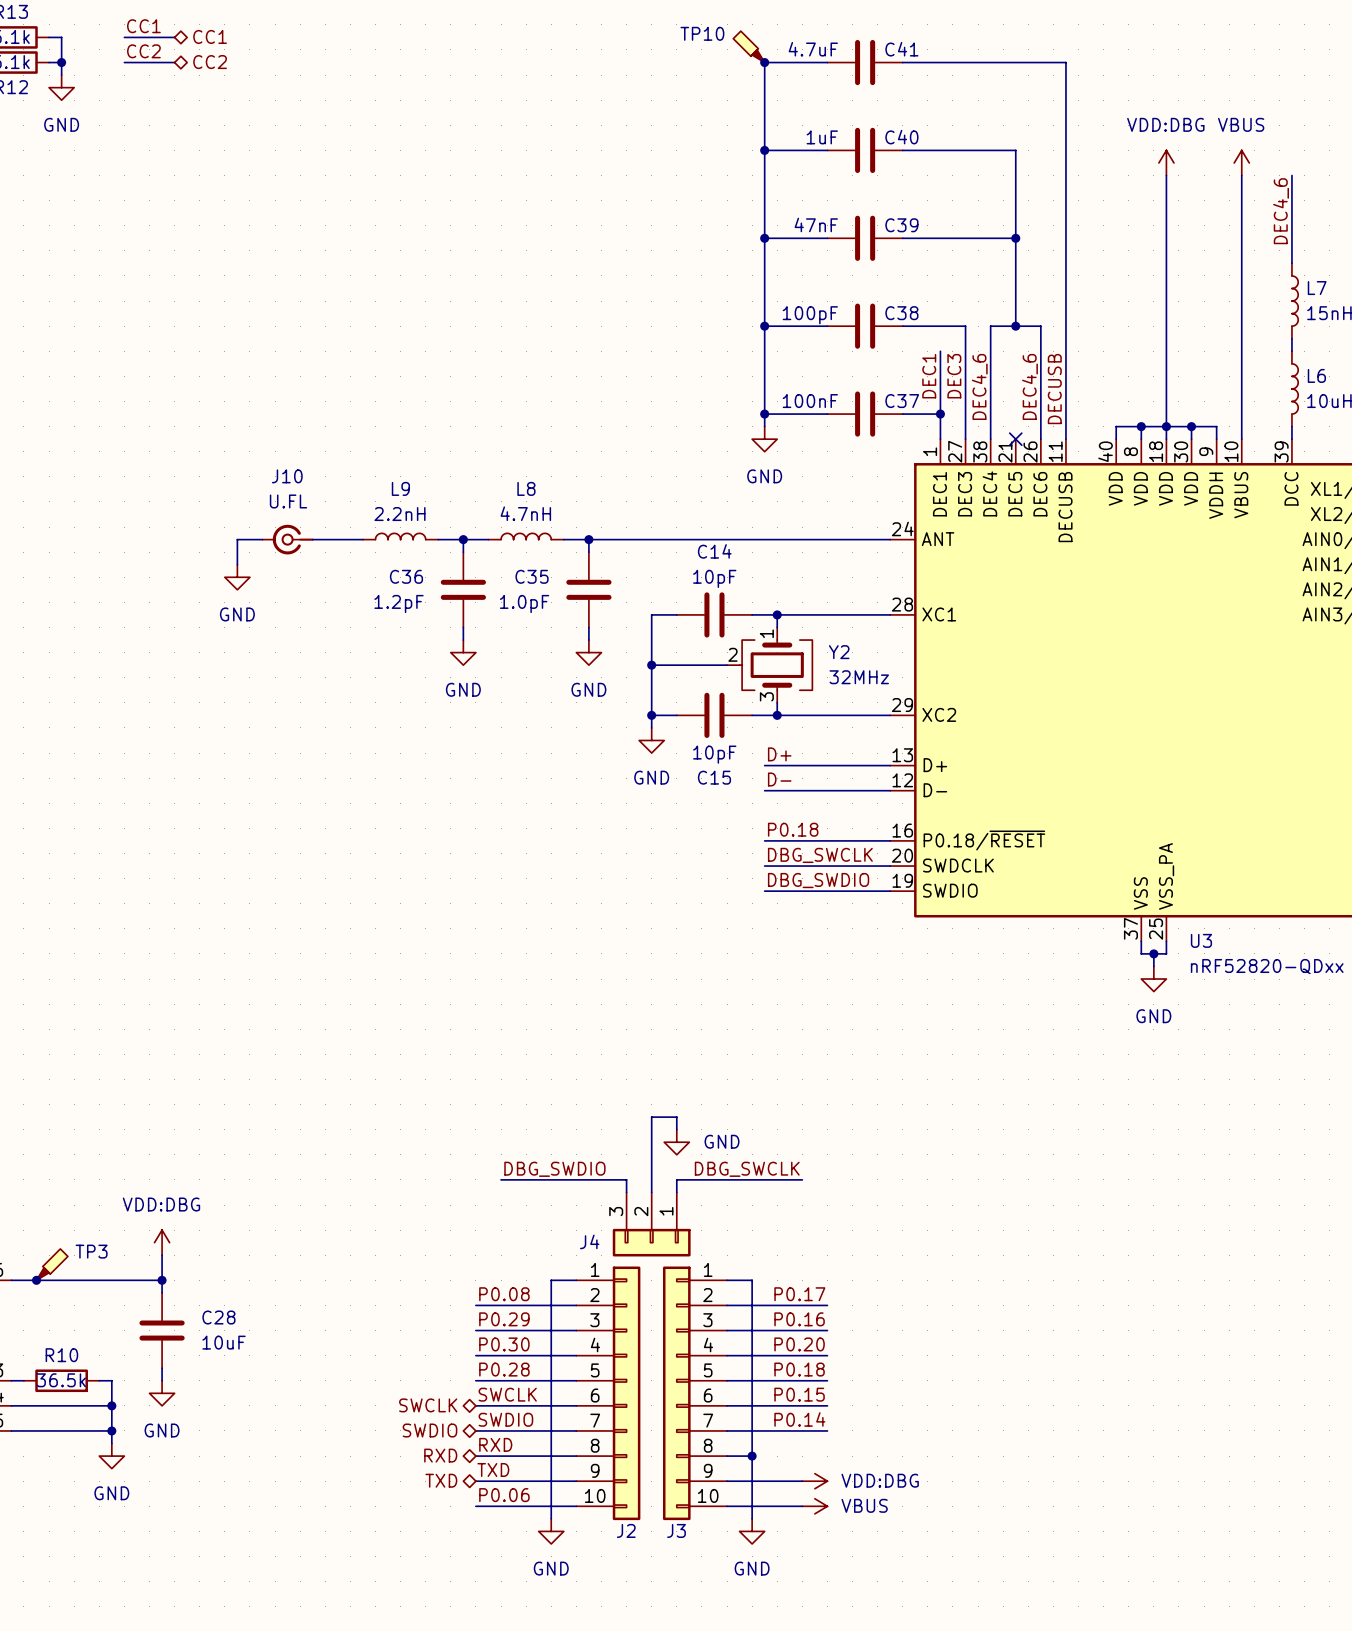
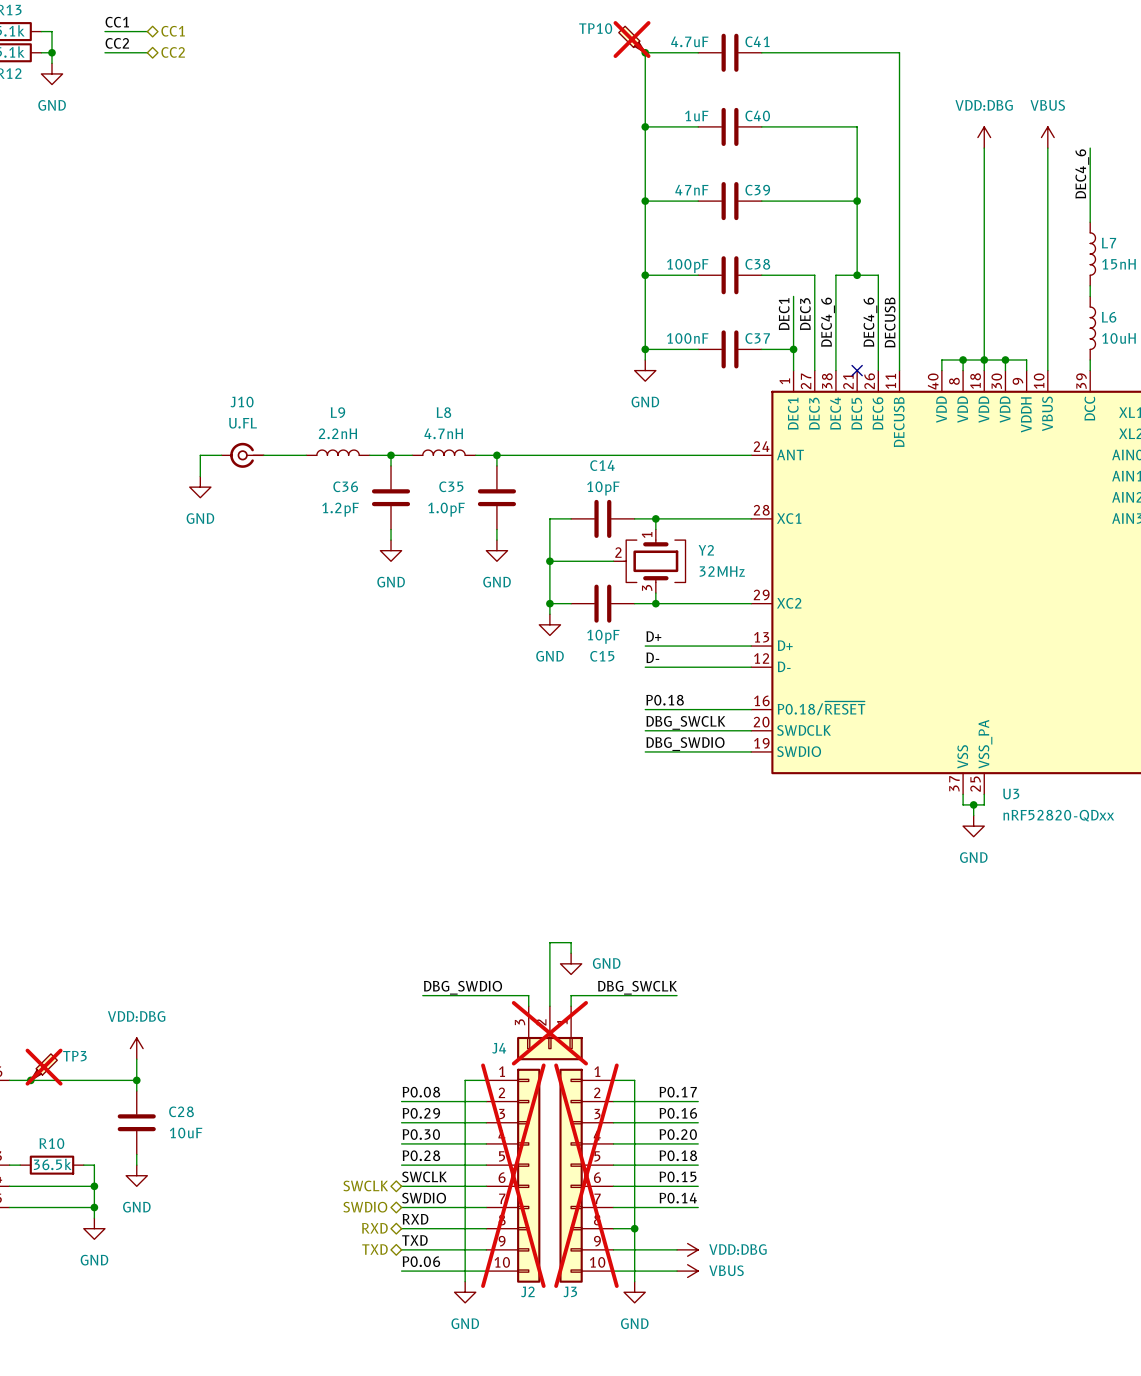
TP10 do-not-place cross: none -> (632, 39)
J4 do-not-place cross: none -> (549, 1033)
TP3 do-not-place cross: none -> (44, 1067)
J2 do-not-place cross: none -> (513, 1175)
J3 do-not-place cross: none -> (586, 1175)

